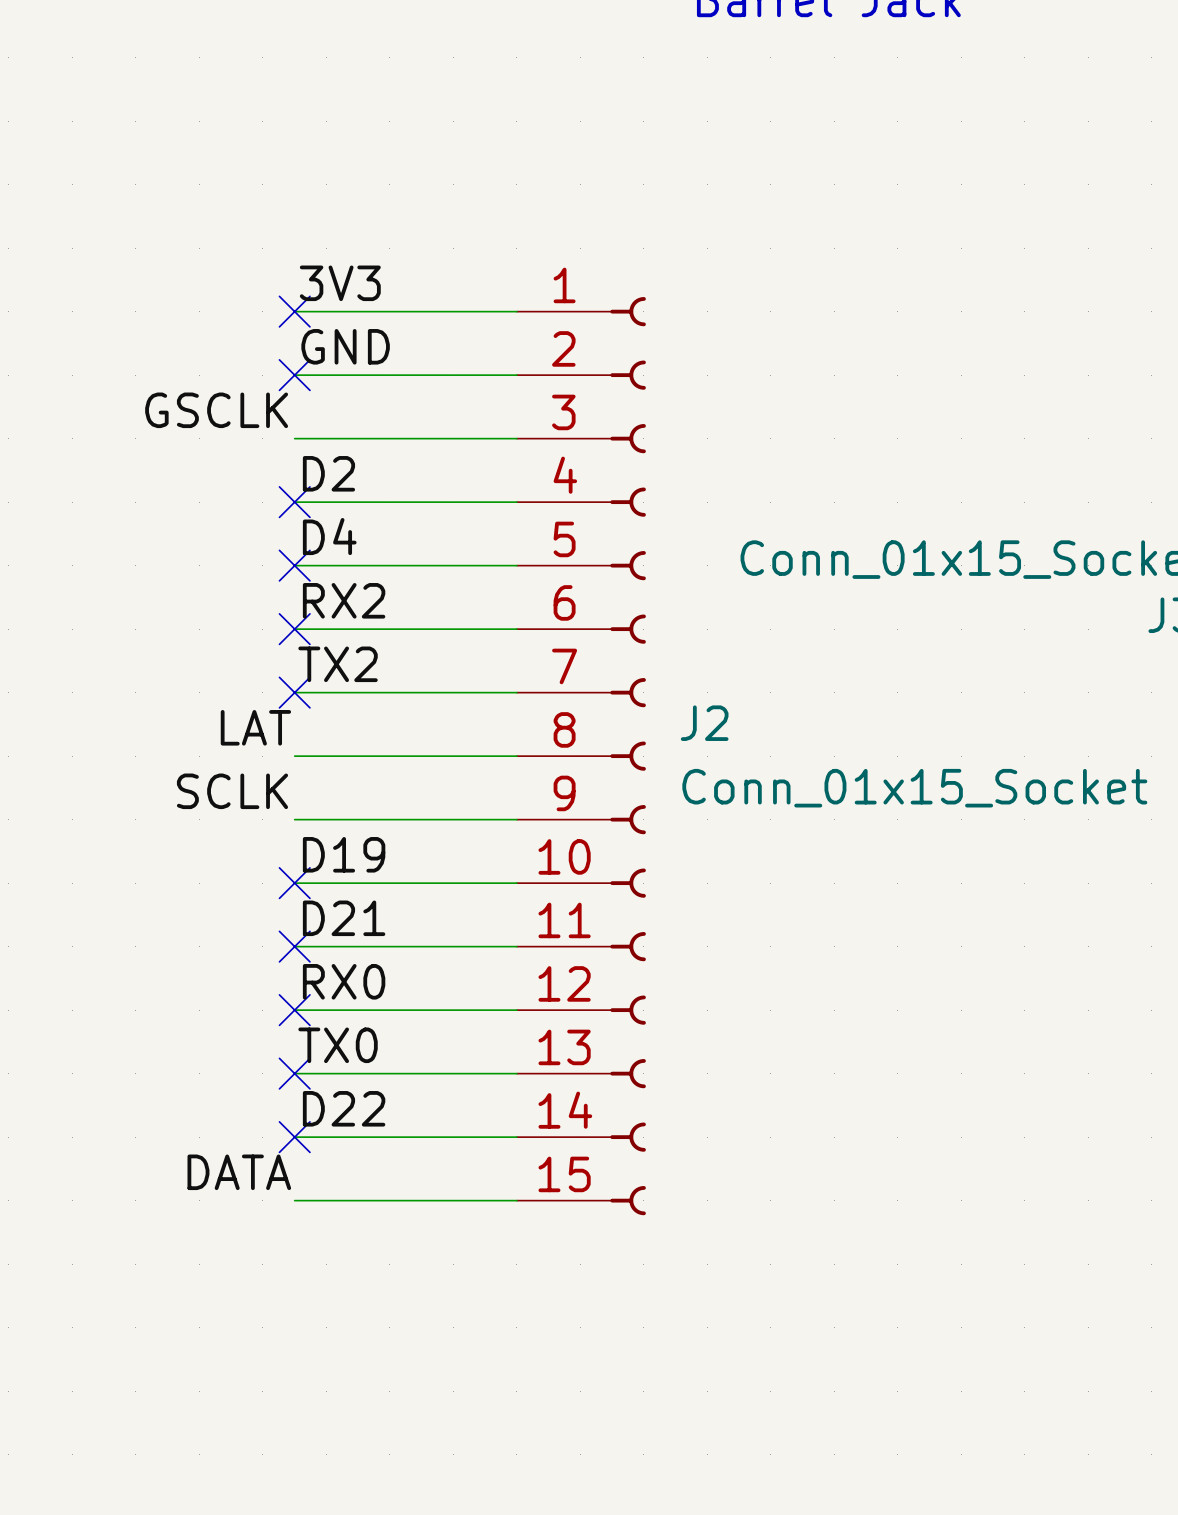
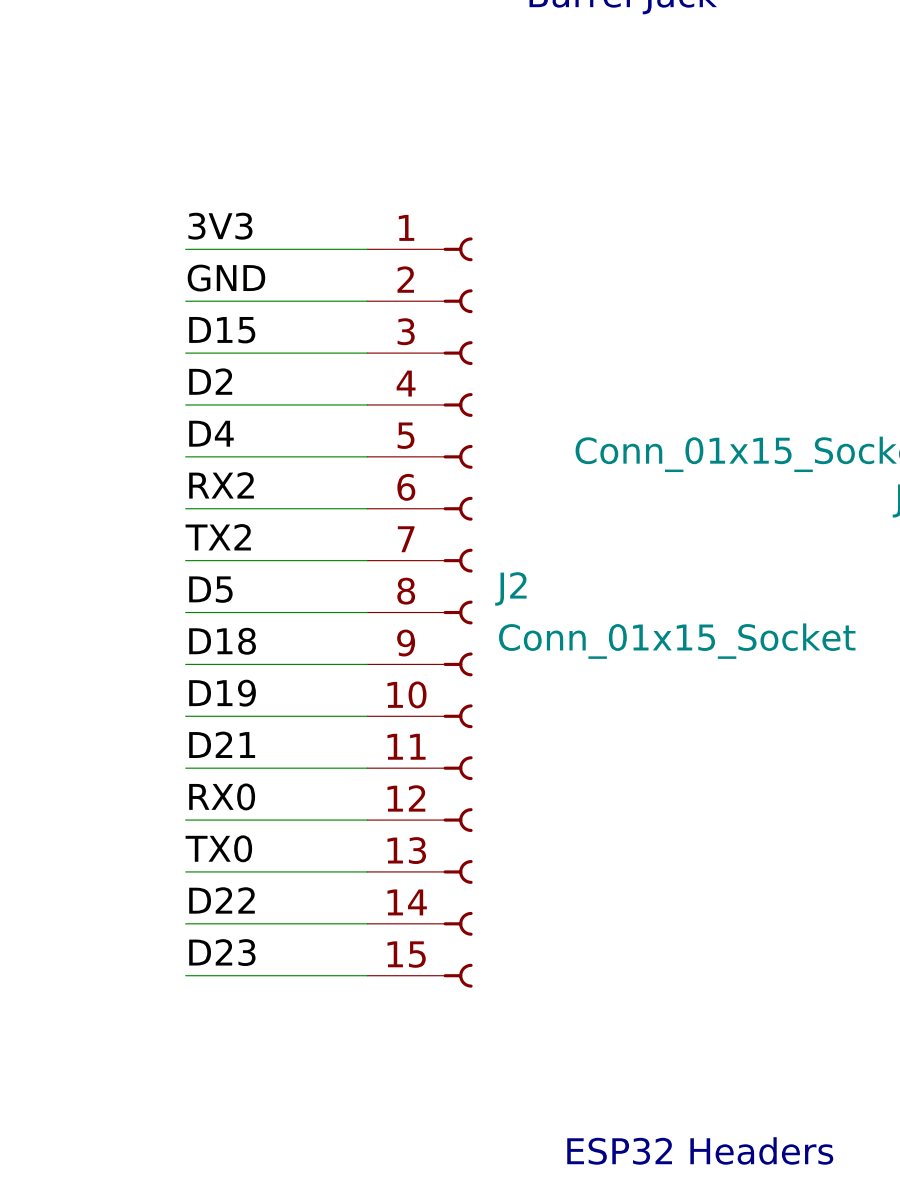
no-connect mark: (294, 311) -> none
no-connect mark: (294, 375) -> none
label: GSCLK (216, 410) -> D15 (222, 330)
no-connect mark: (294, 502) -> none
no-connect mark: (294, 565) -> none
no-connect mark: (294, 629) -> none
no-connect mark: (294, 692) -> none
label: LAT (255, 727) -> D5 (210, 589)
label: SCLK (232, 791) -> D18 (222, 641)
no-connect mark: (294, 883) -> none
no-connect mark: (294, 946) -> none
no-connect mark: (294, 1010) -> none
no-connect mark: (294, 1073) -> none
no-connect mark: (294, 1137) -> none
label: DATA (239, 1172) -> D23 (222, 952)
text: none -> ESP32 Headers (700, 1150)

